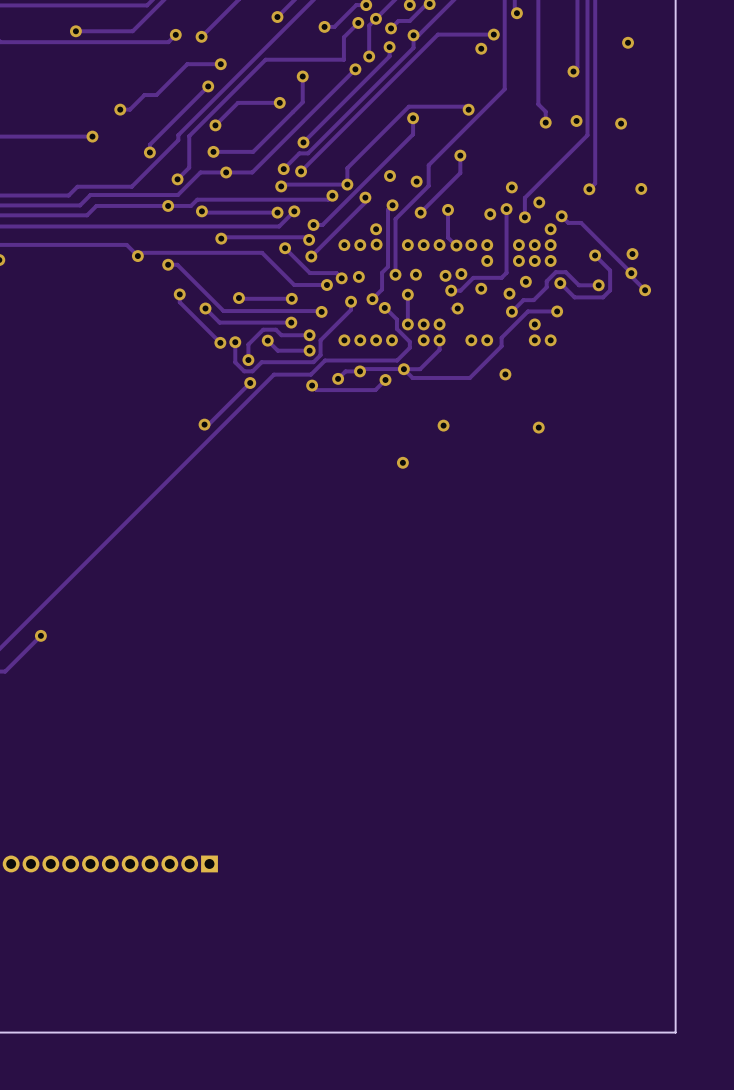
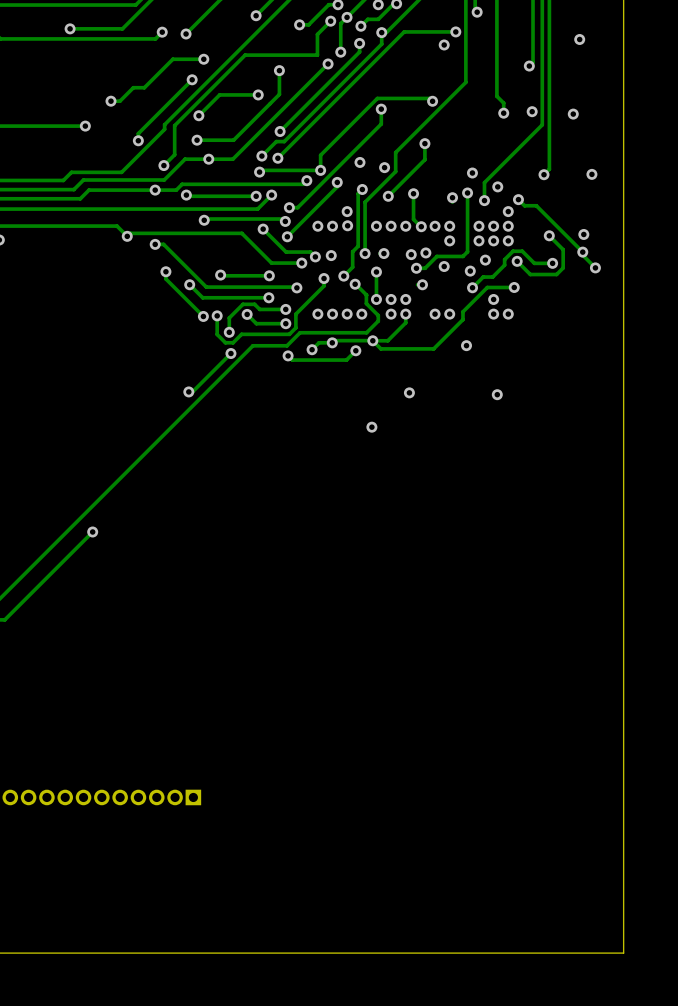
track: none -> (92, 531) (37, 586)
via position: (40, 635) -> (92, 531)

